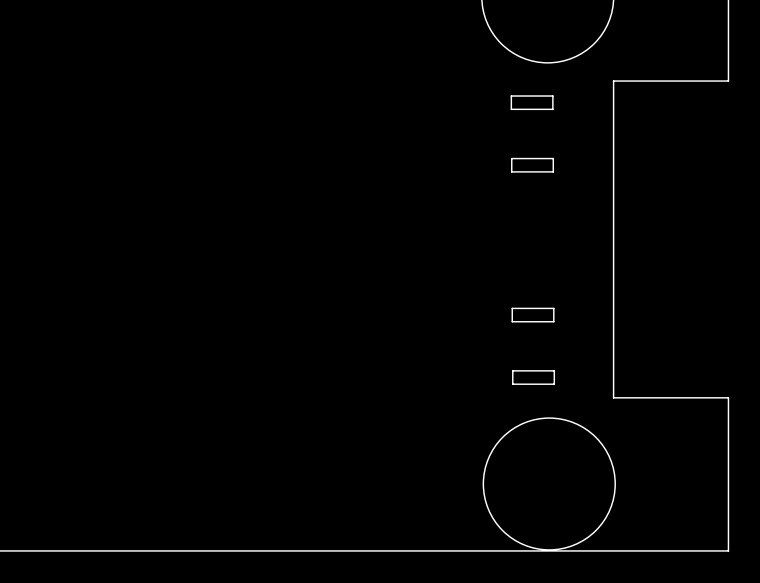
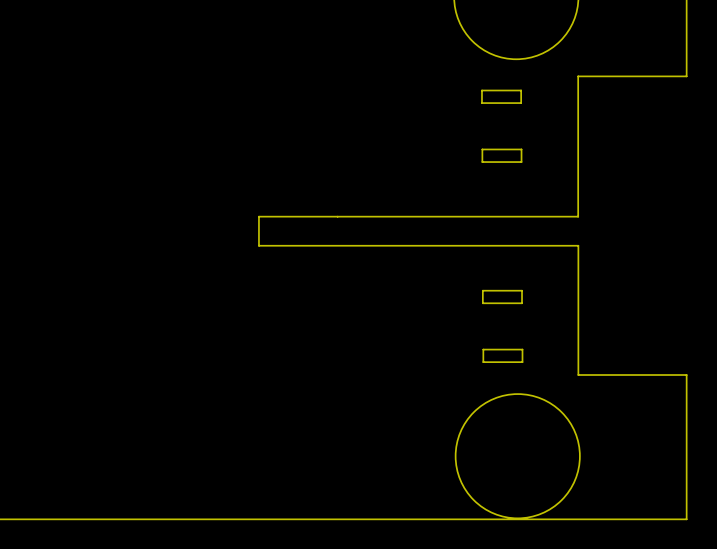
board edge: (613, 81) (613, 260) -> (578, 76) (578, 216) (258, 216) (258, 245) (578, 245)

